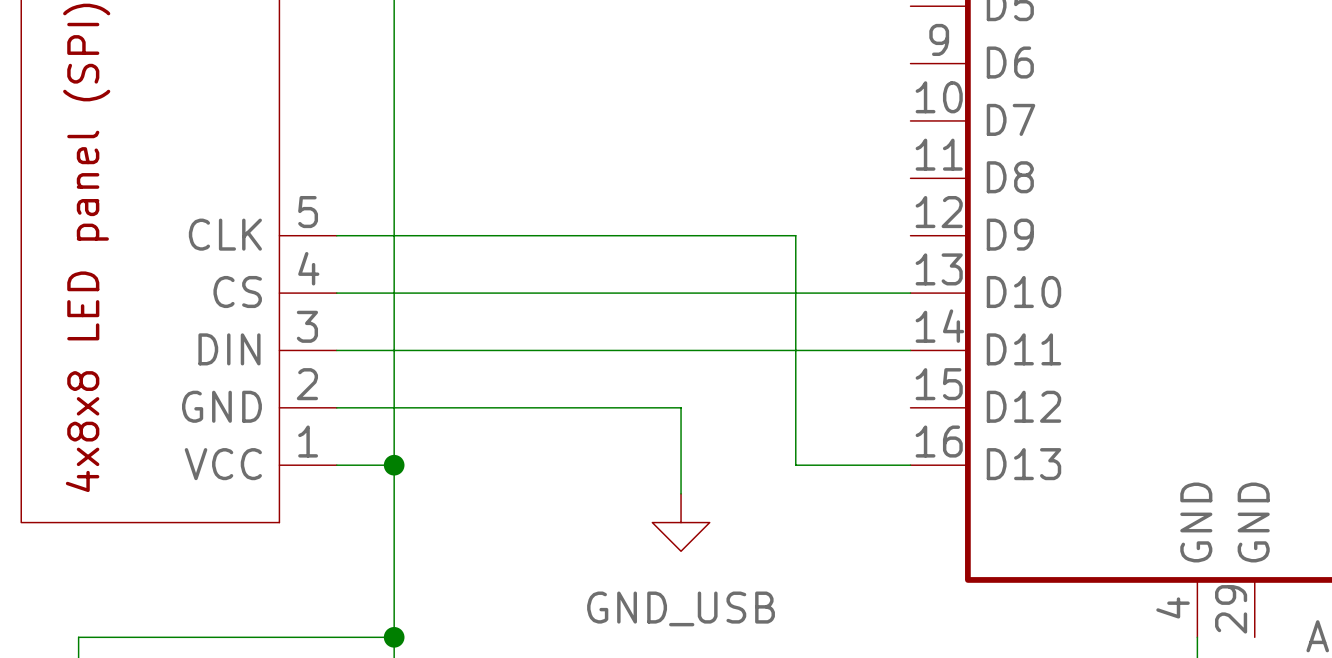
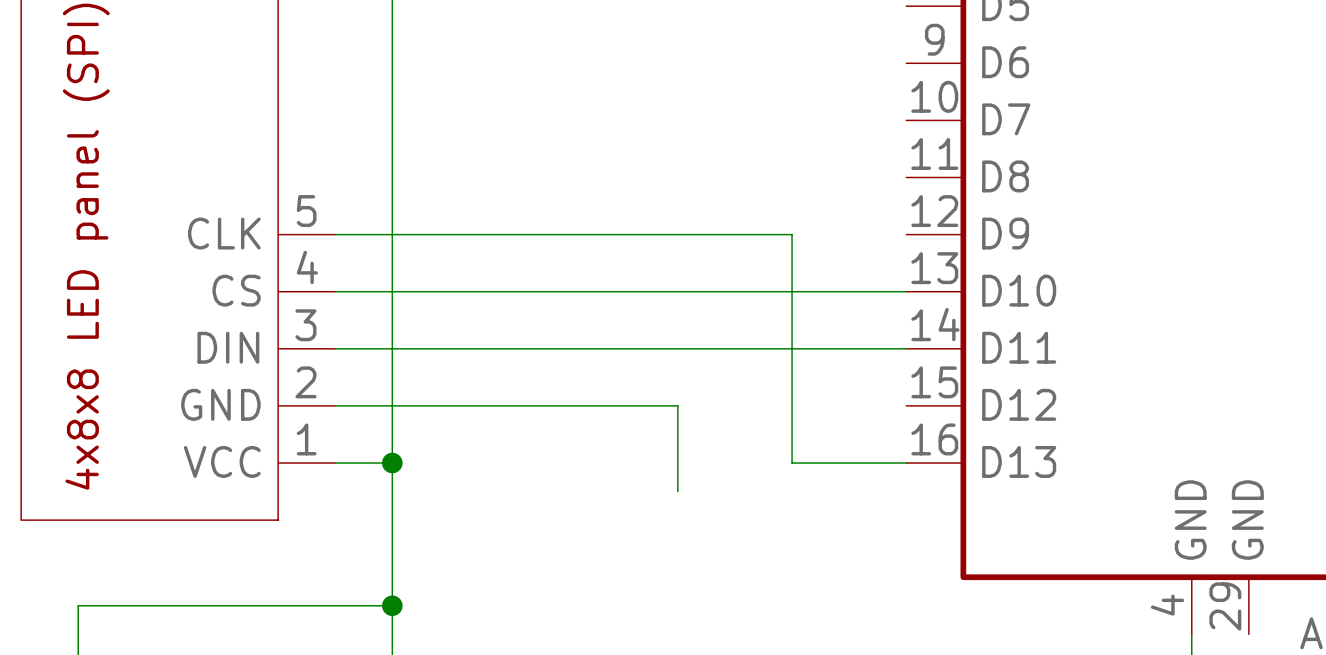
power symbol: GND_USB (681, 522) -> none
wire: (78, 637) (394, 637) -> (78, 634) (78, 605) (392, 605)
junction position: (394, 637) -> (392, 605)

